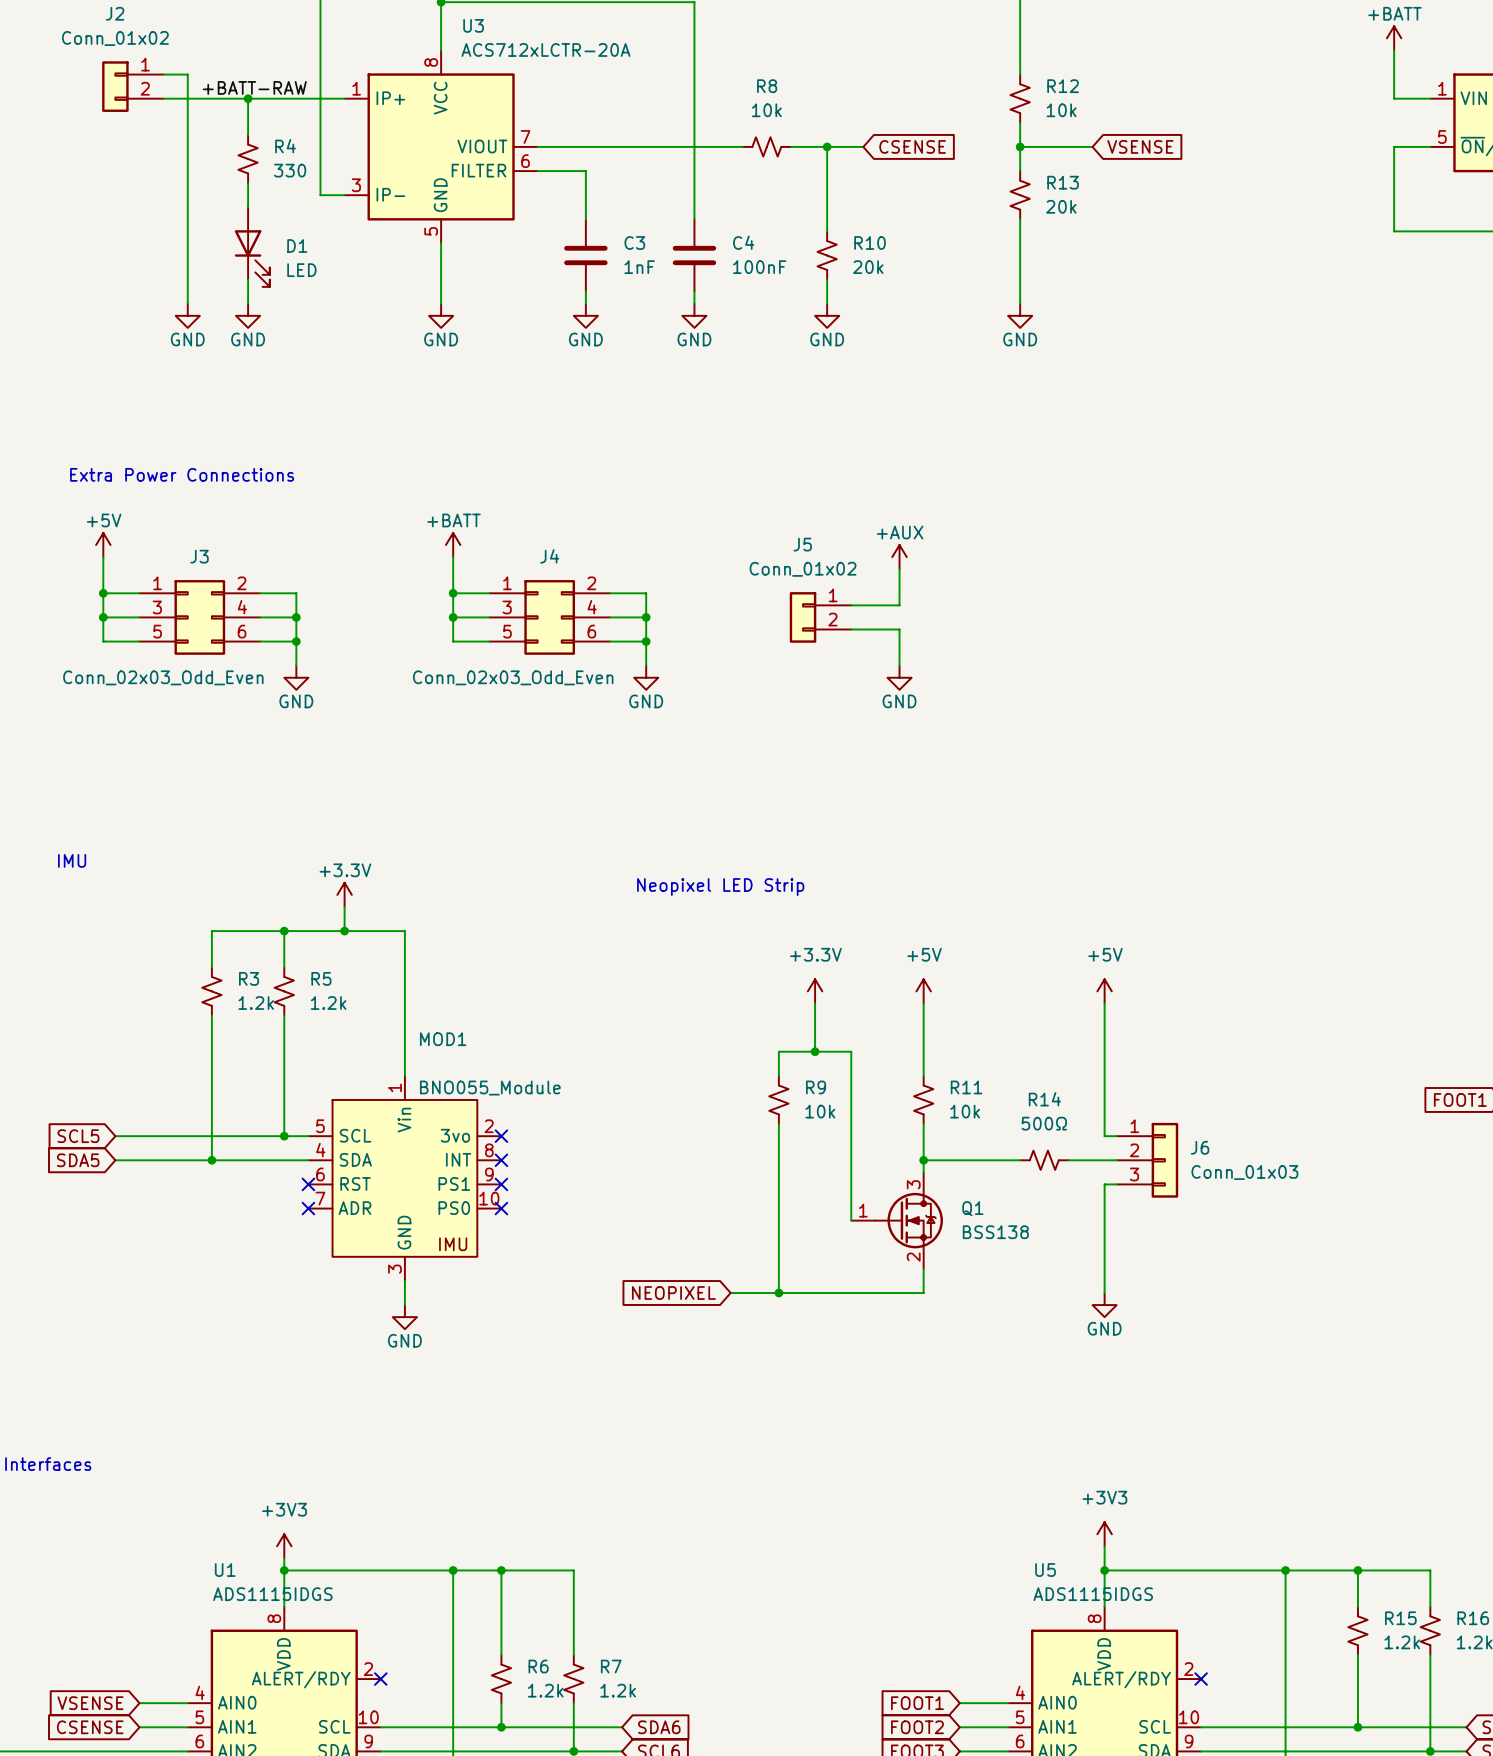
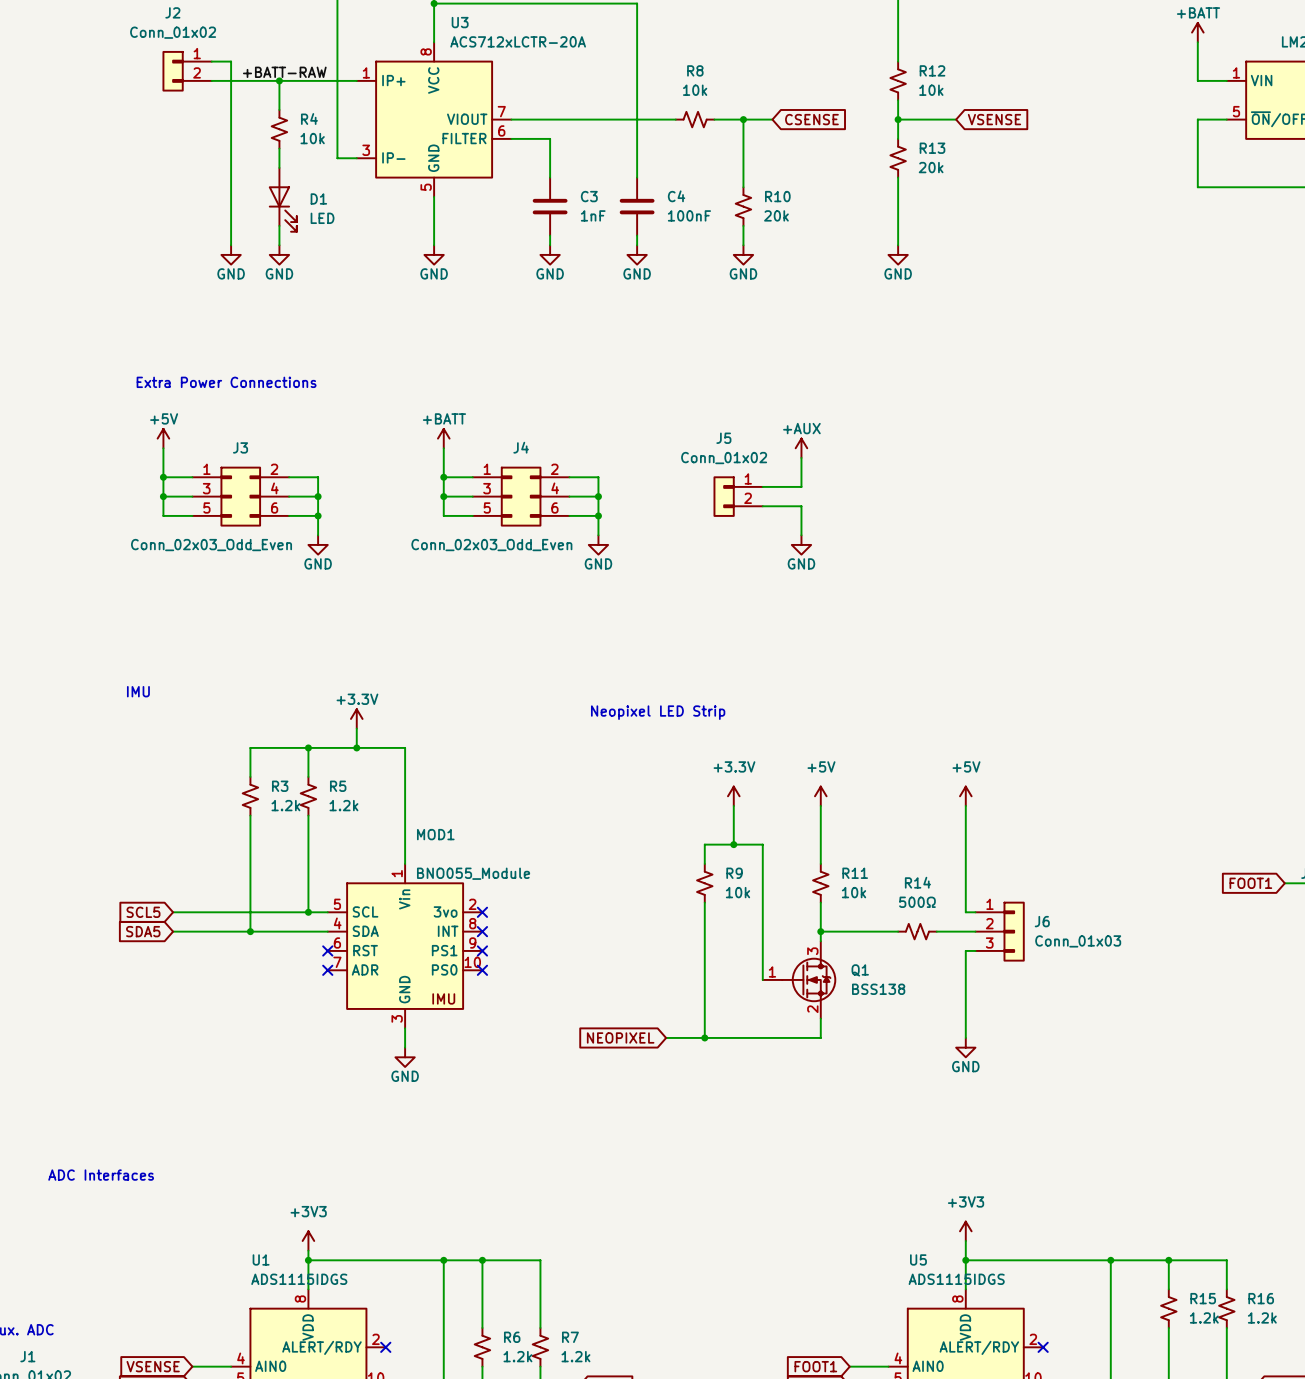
R4 value: 330 (290, 170) -> 10k (312, 138)

